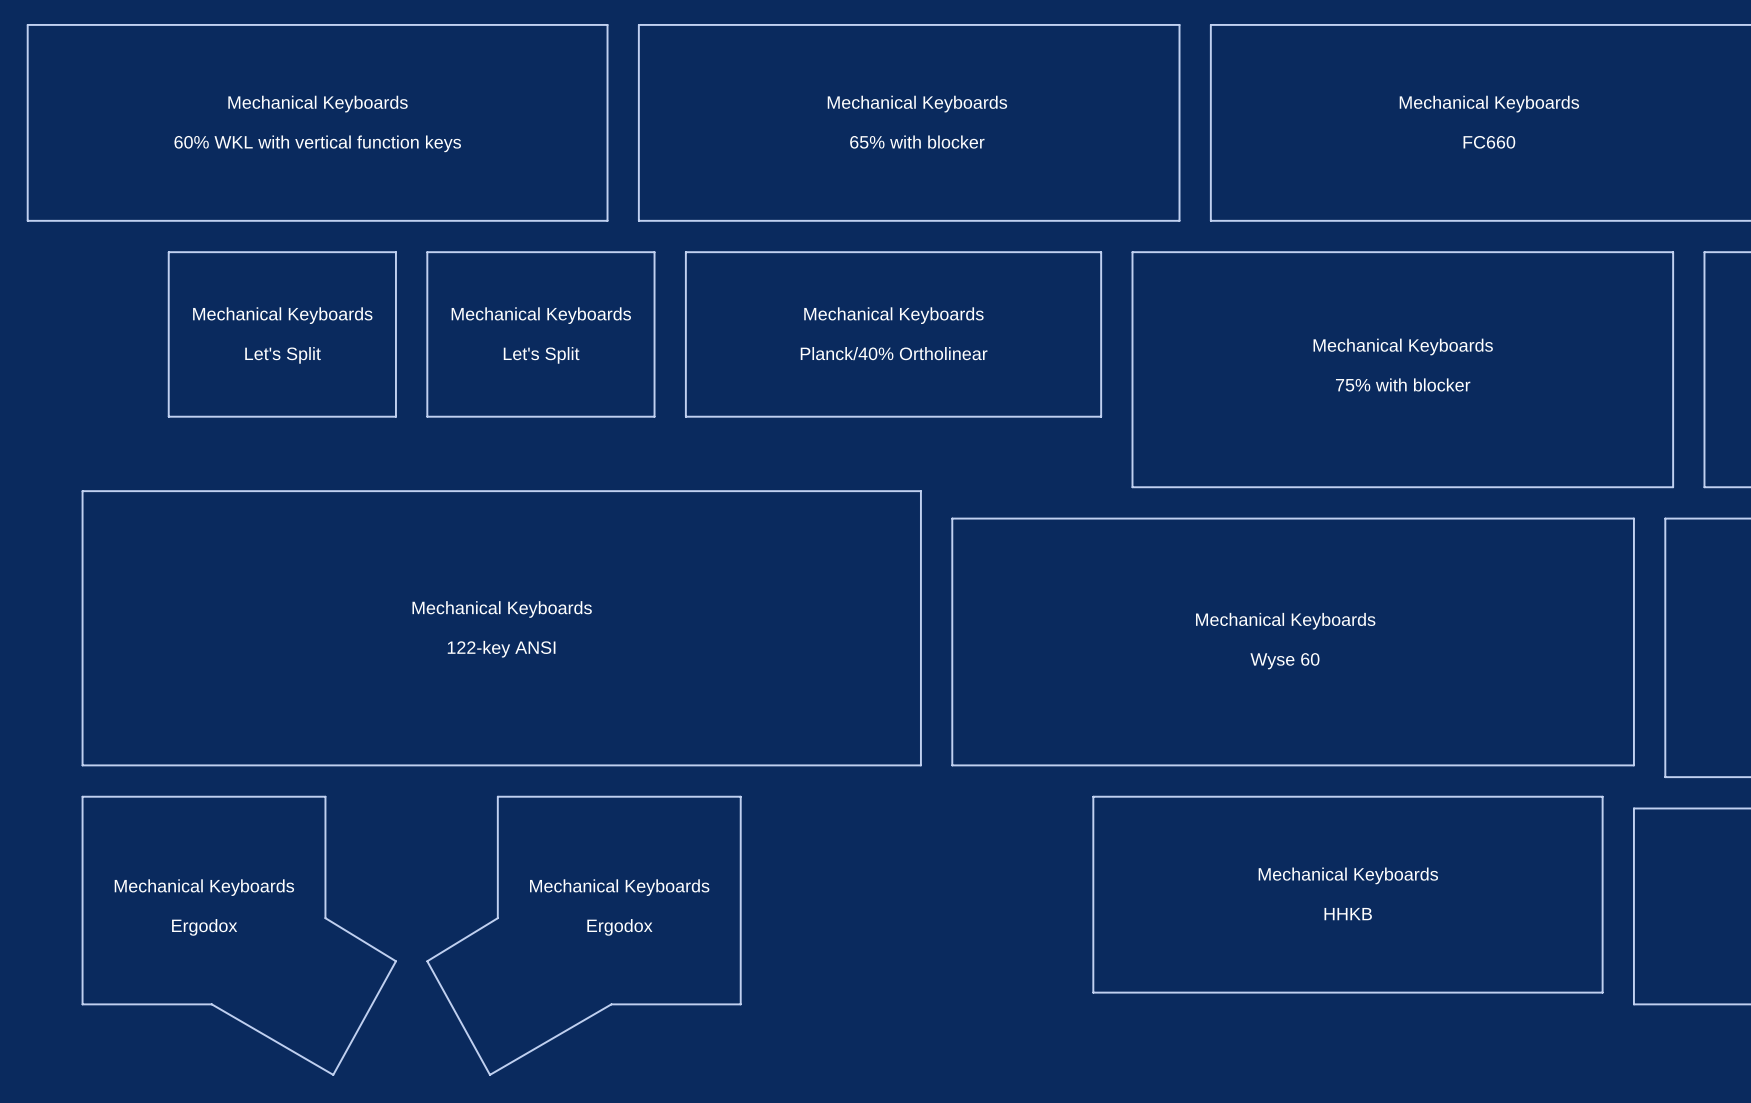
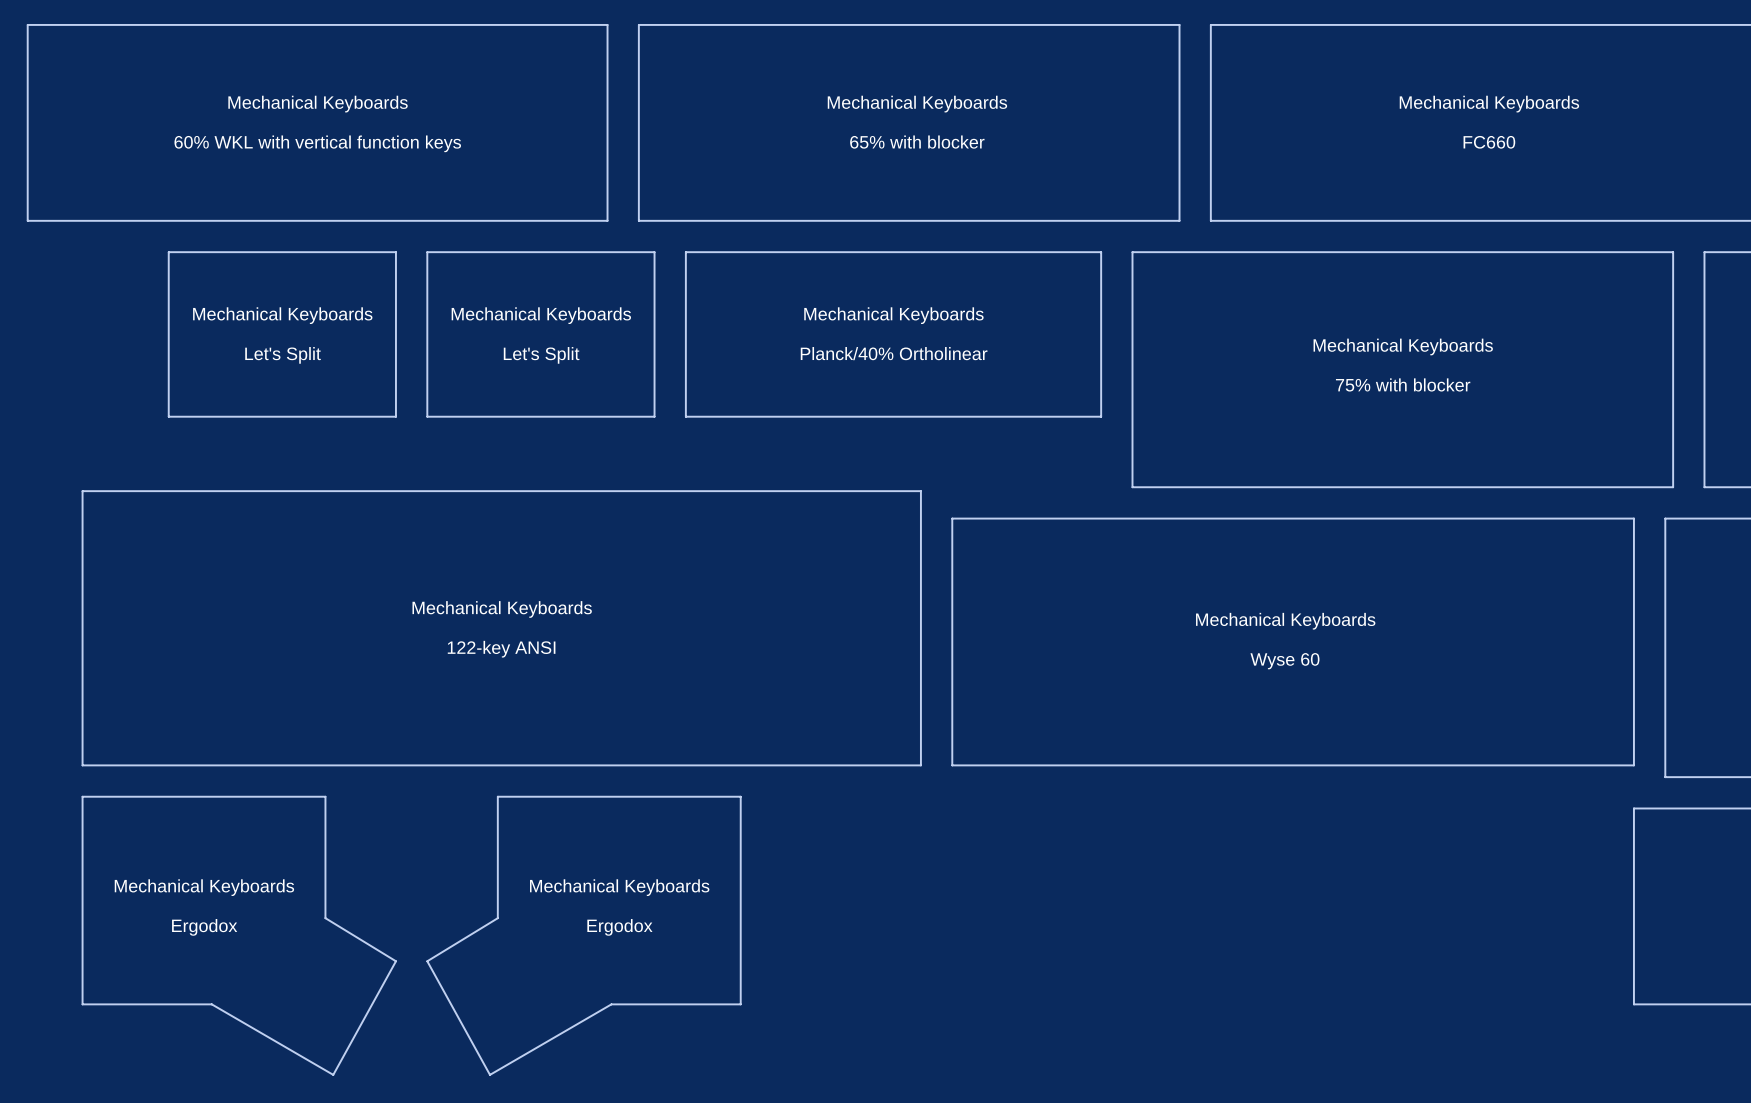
board edge: (1602, 796) (1093, 796) (1093, 992) (1602, 992) (1602, 796) -> none
text: Mechanical Keyboards (1348, 875) -> none
text: HHKB (1348, 914) -> none

